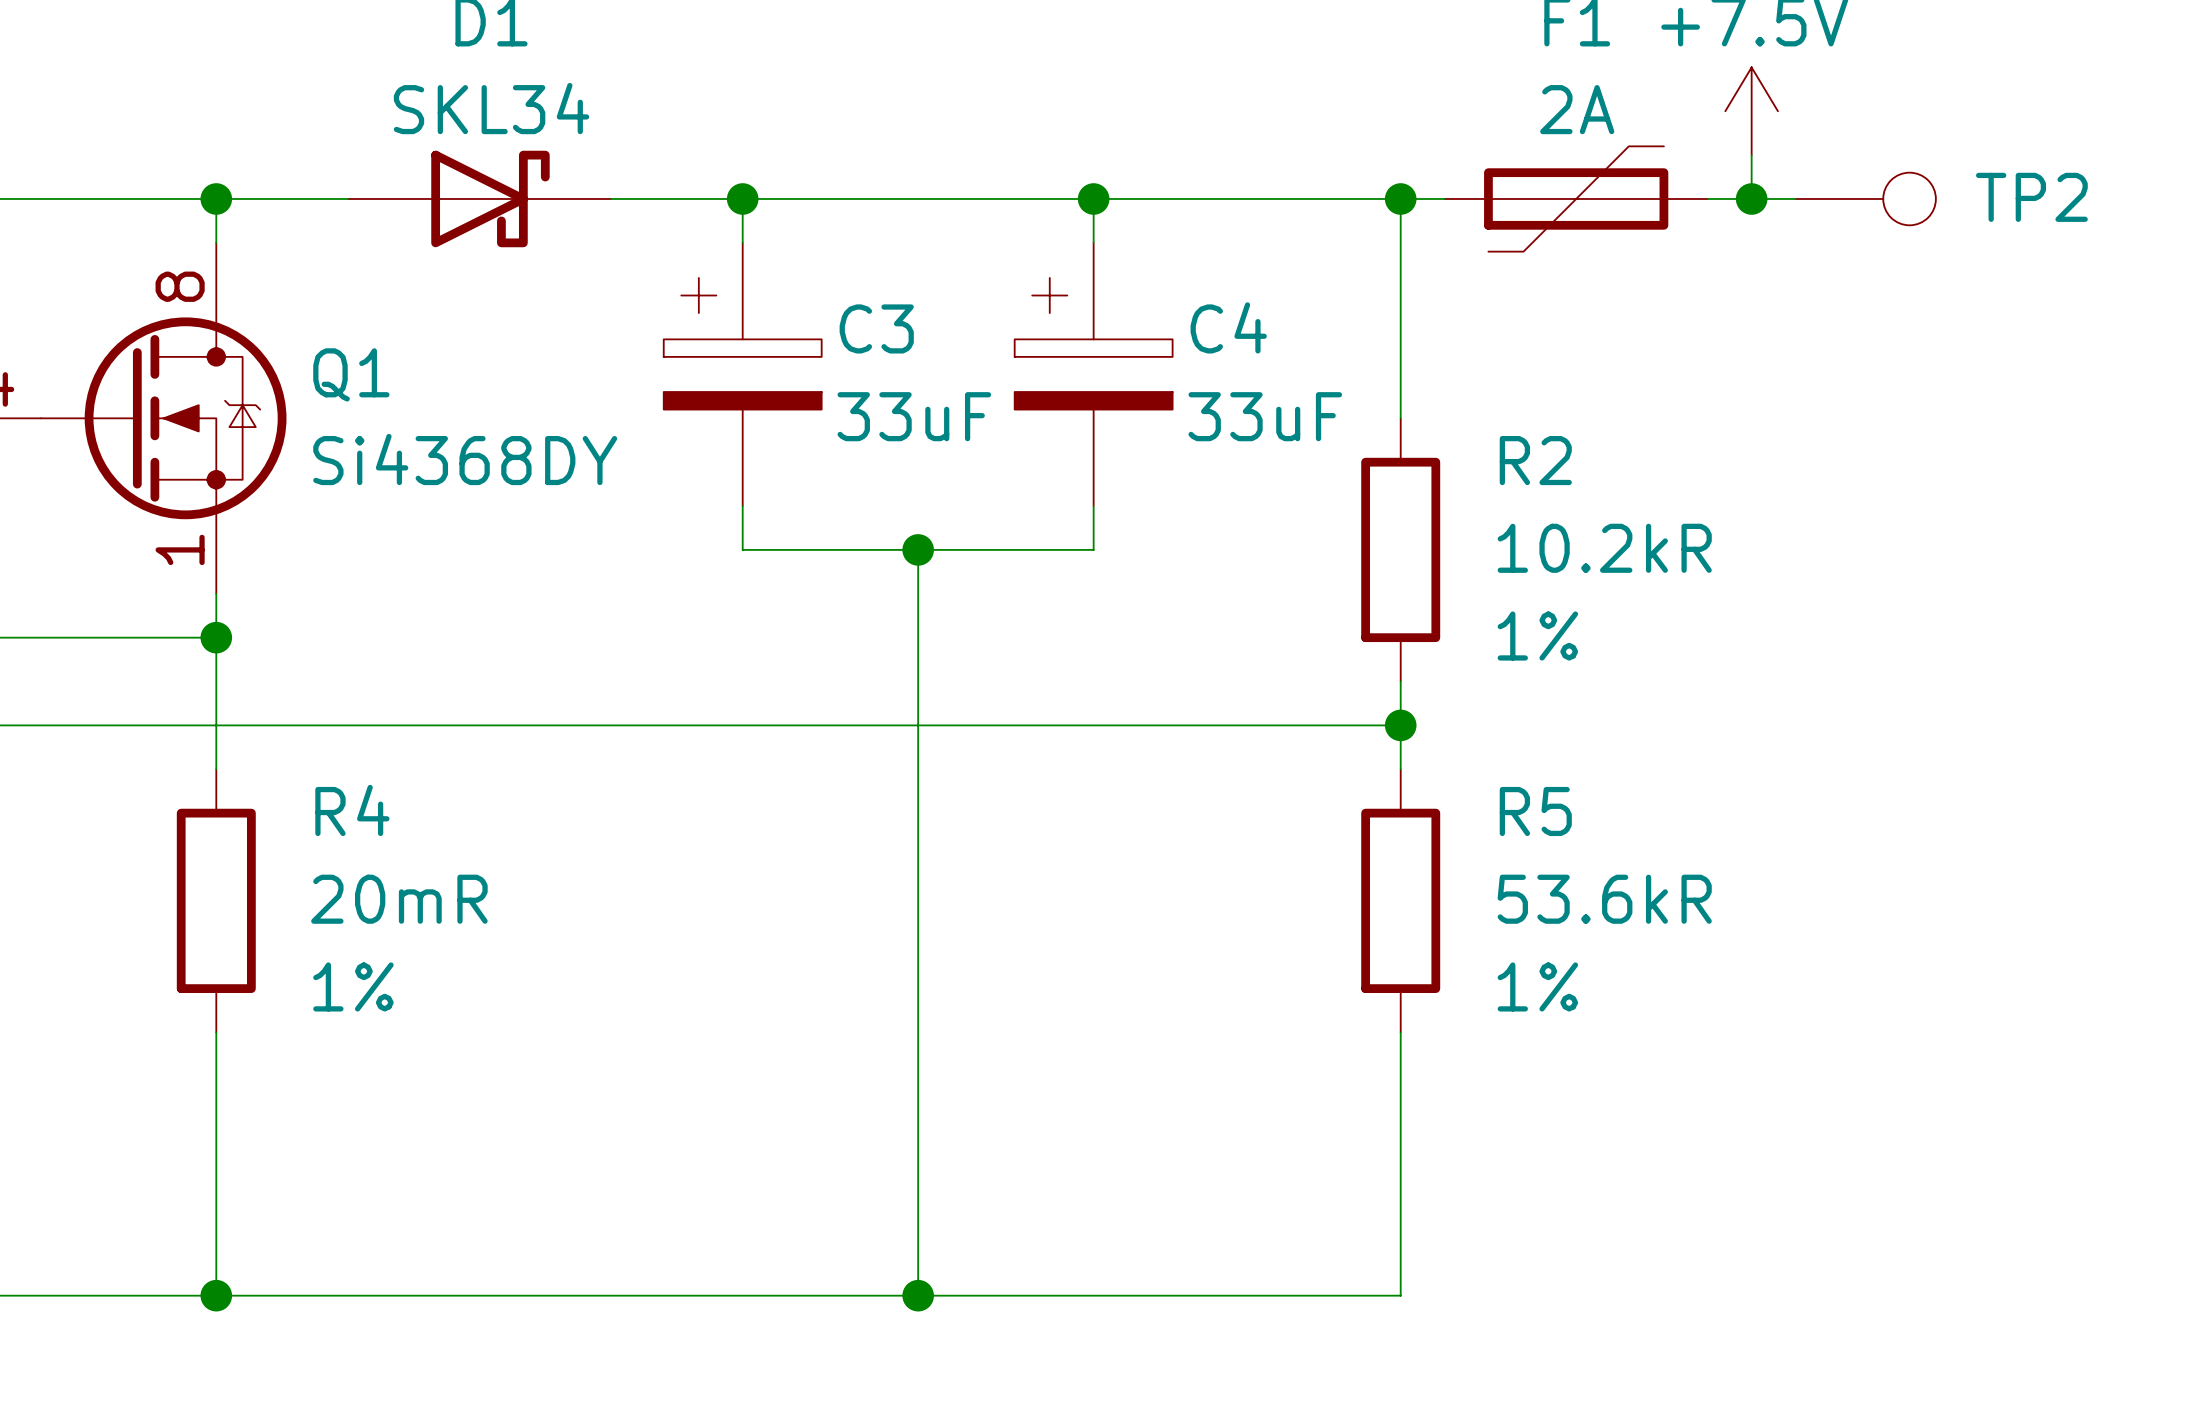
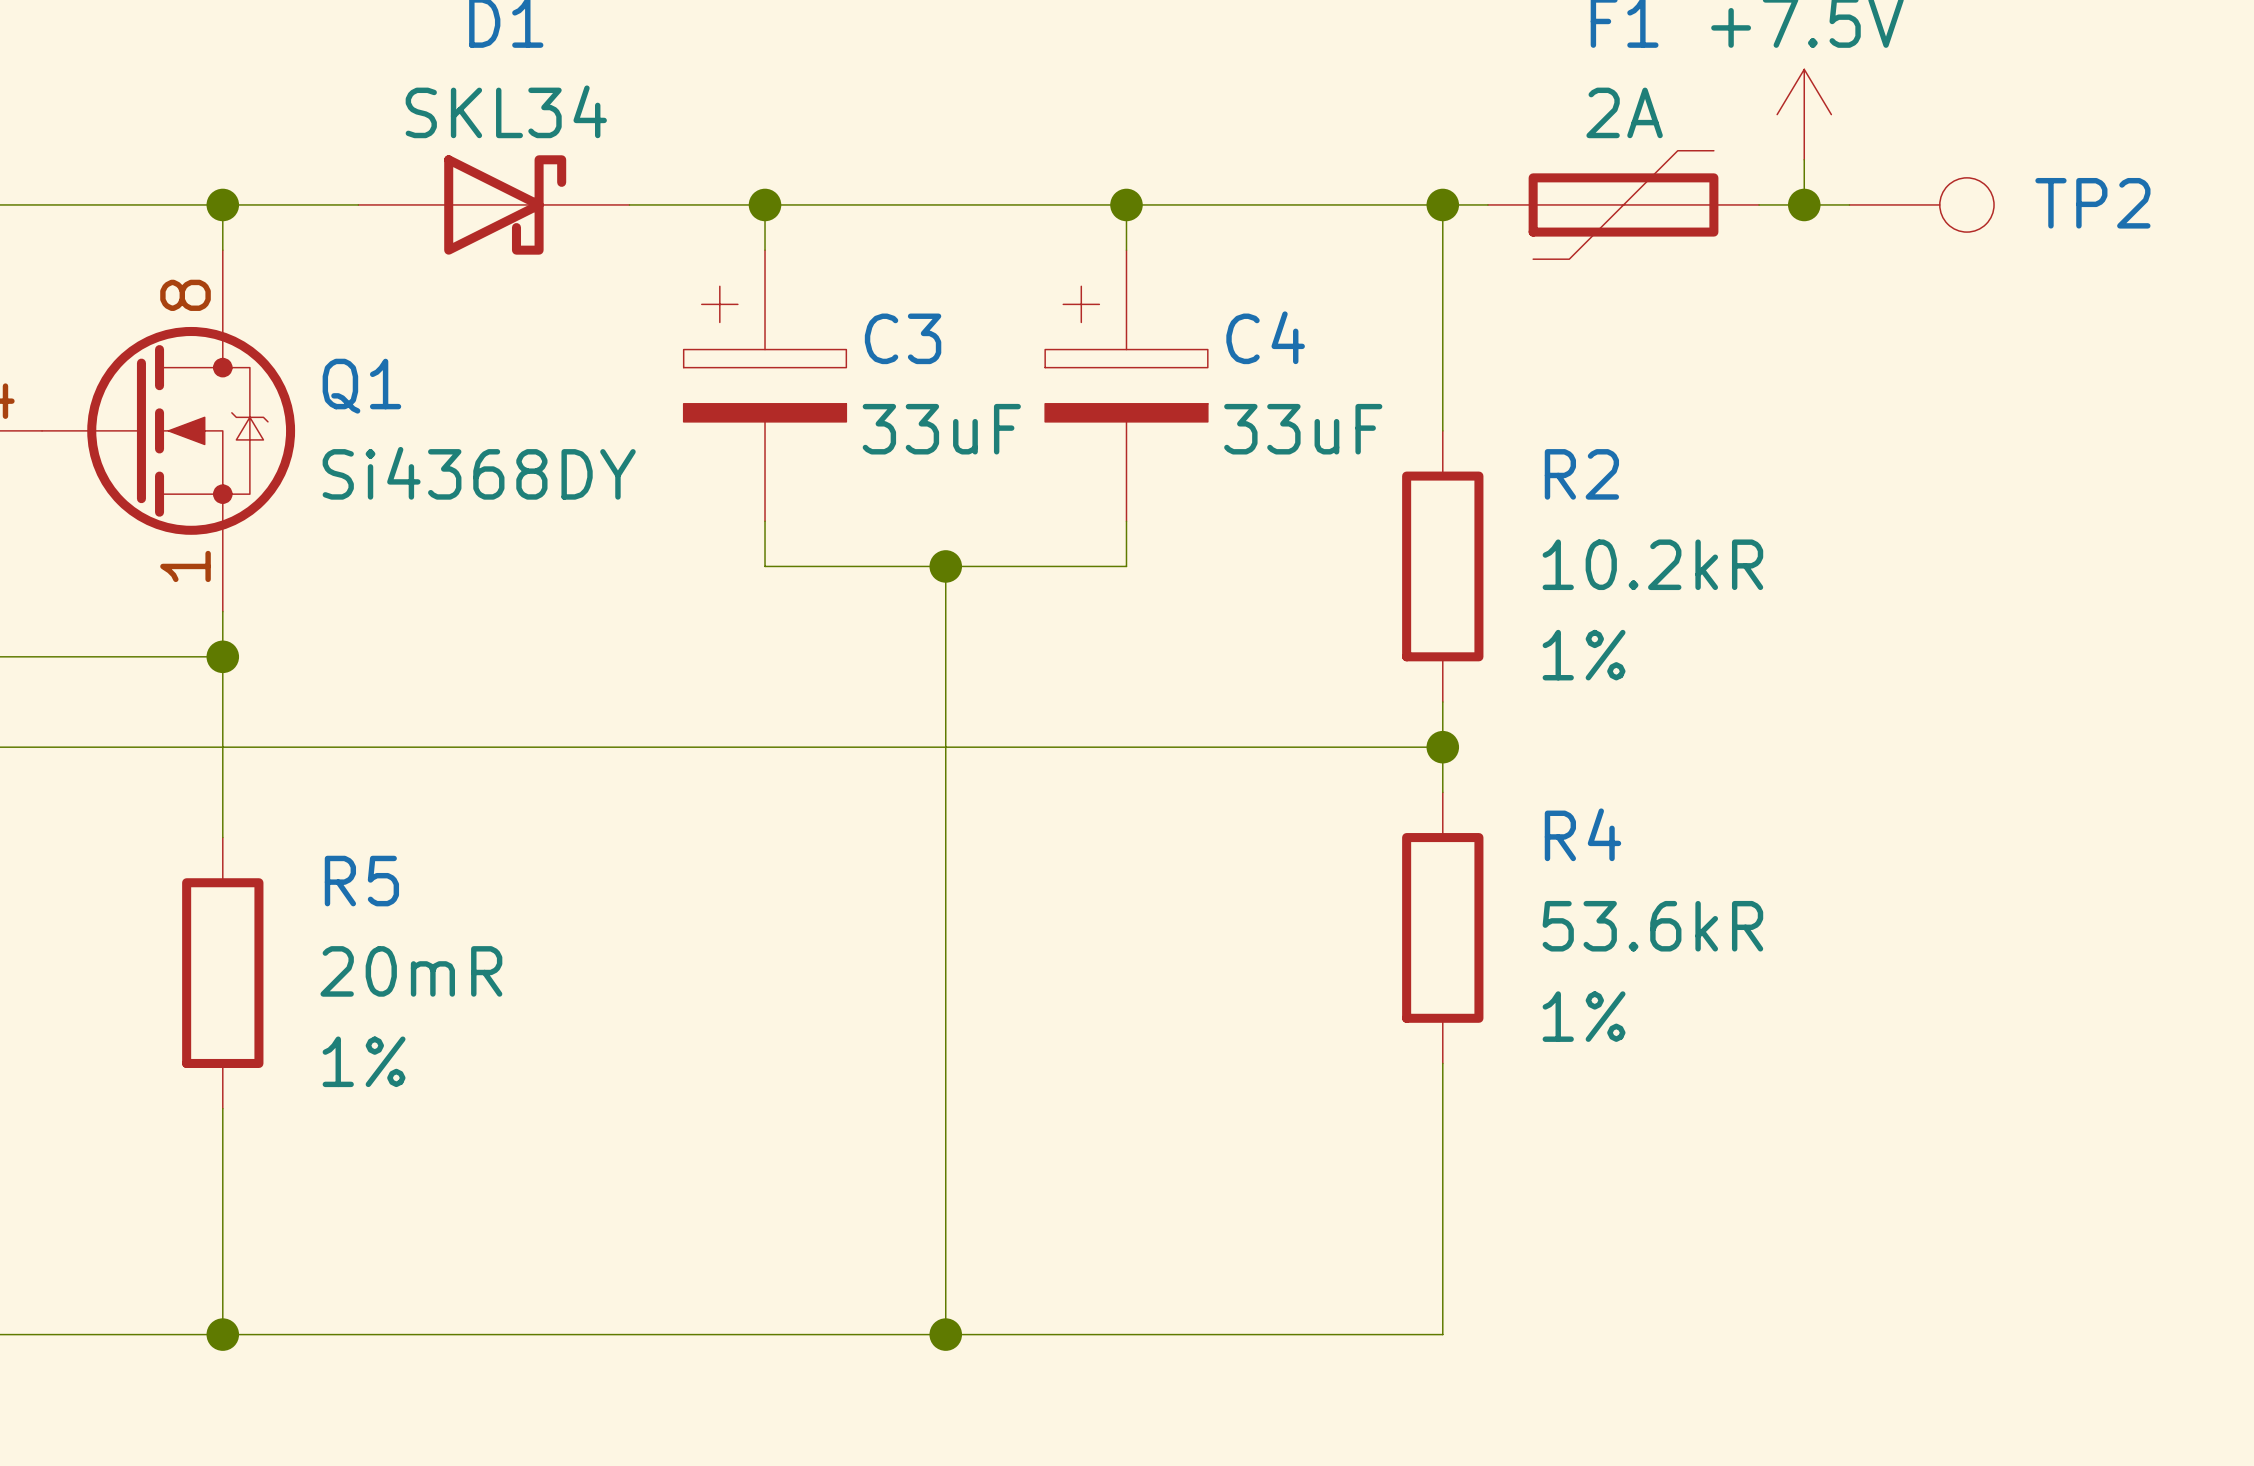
R5 name: R5 (1535, 811) -> R4 (1582, 834)
R4: 20mR (216, 900) -> none
R5: none -> 20mR (222, 973)

